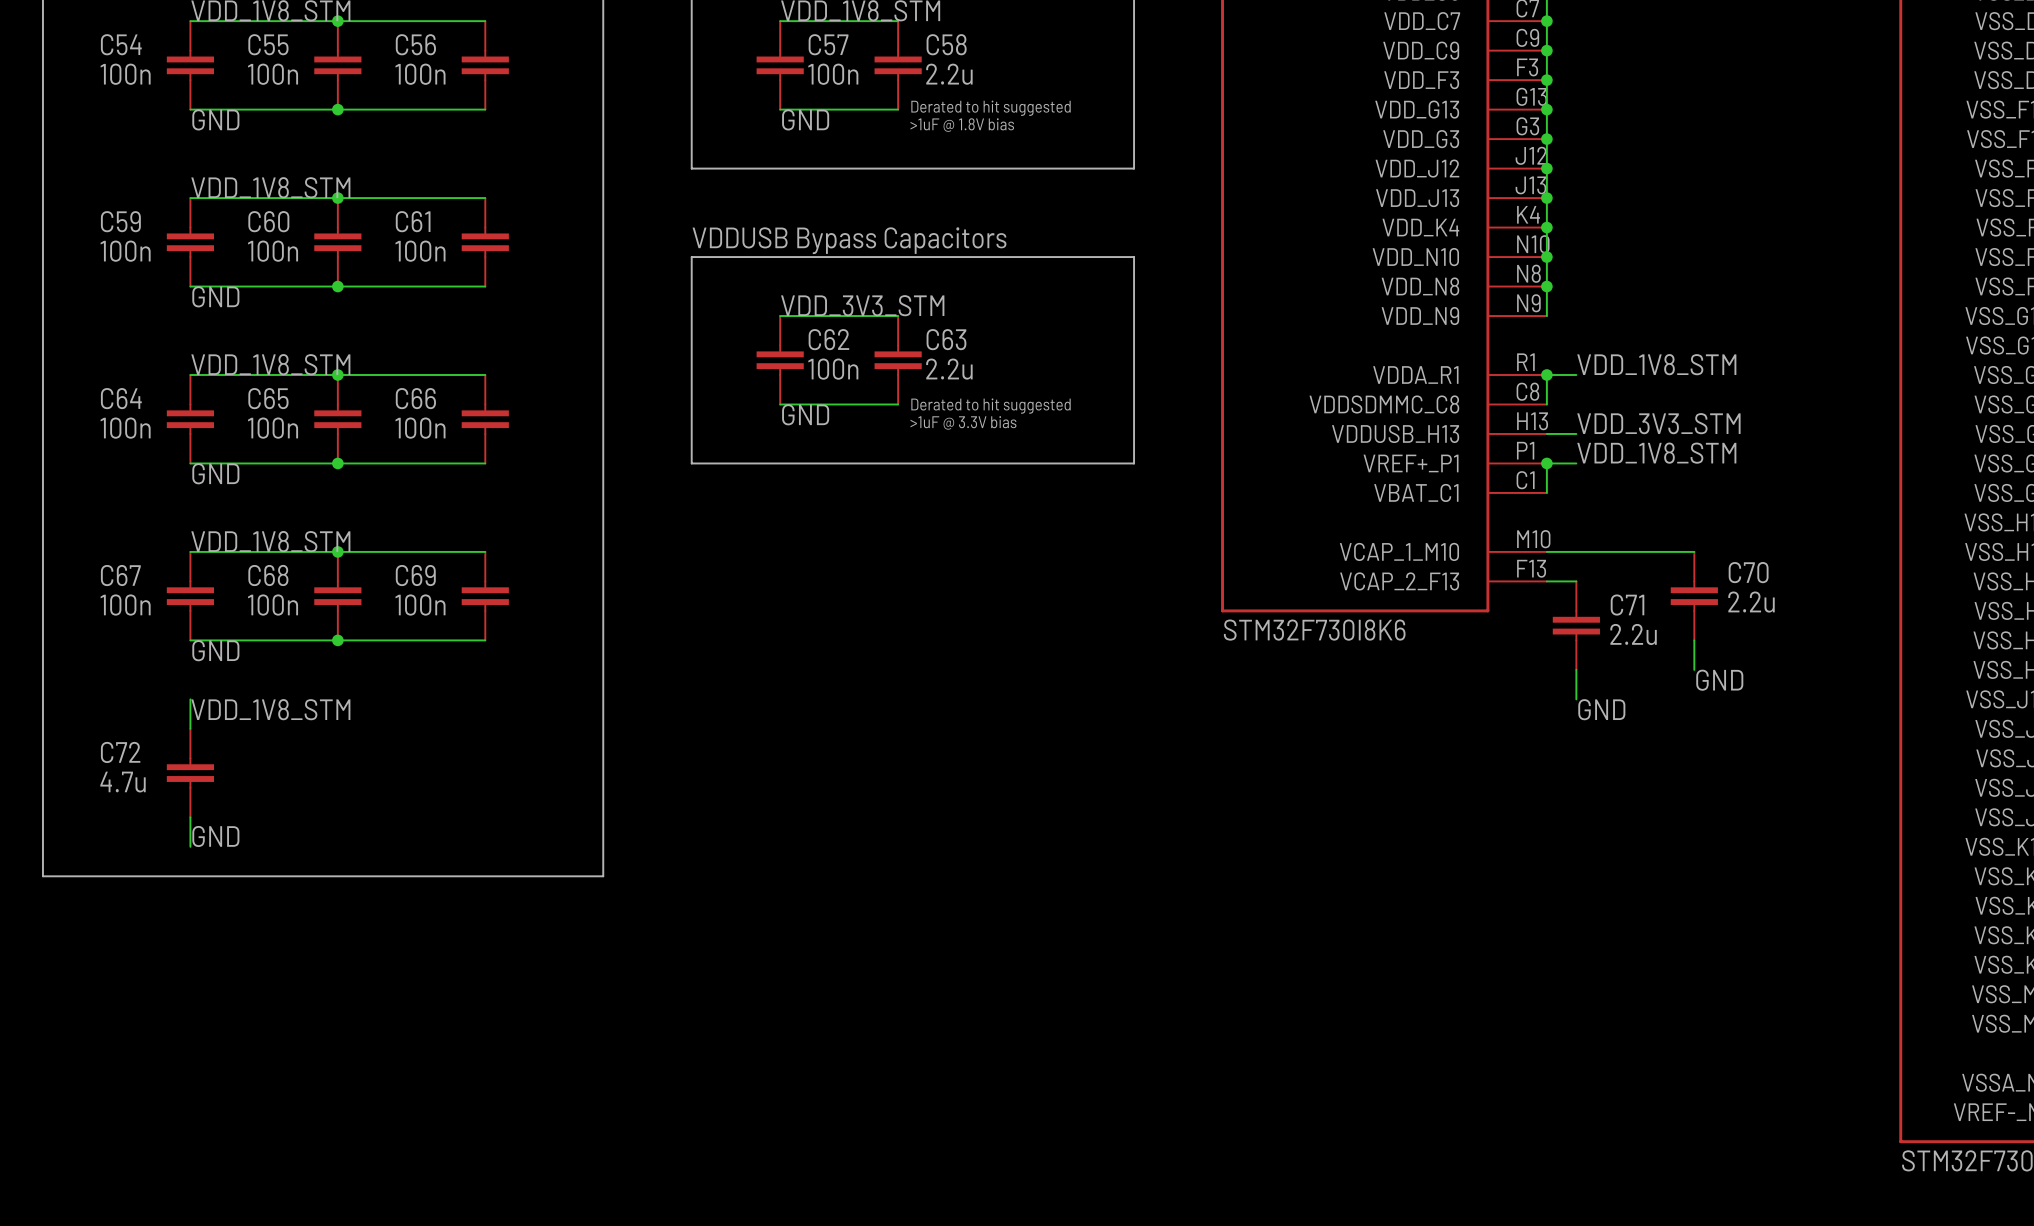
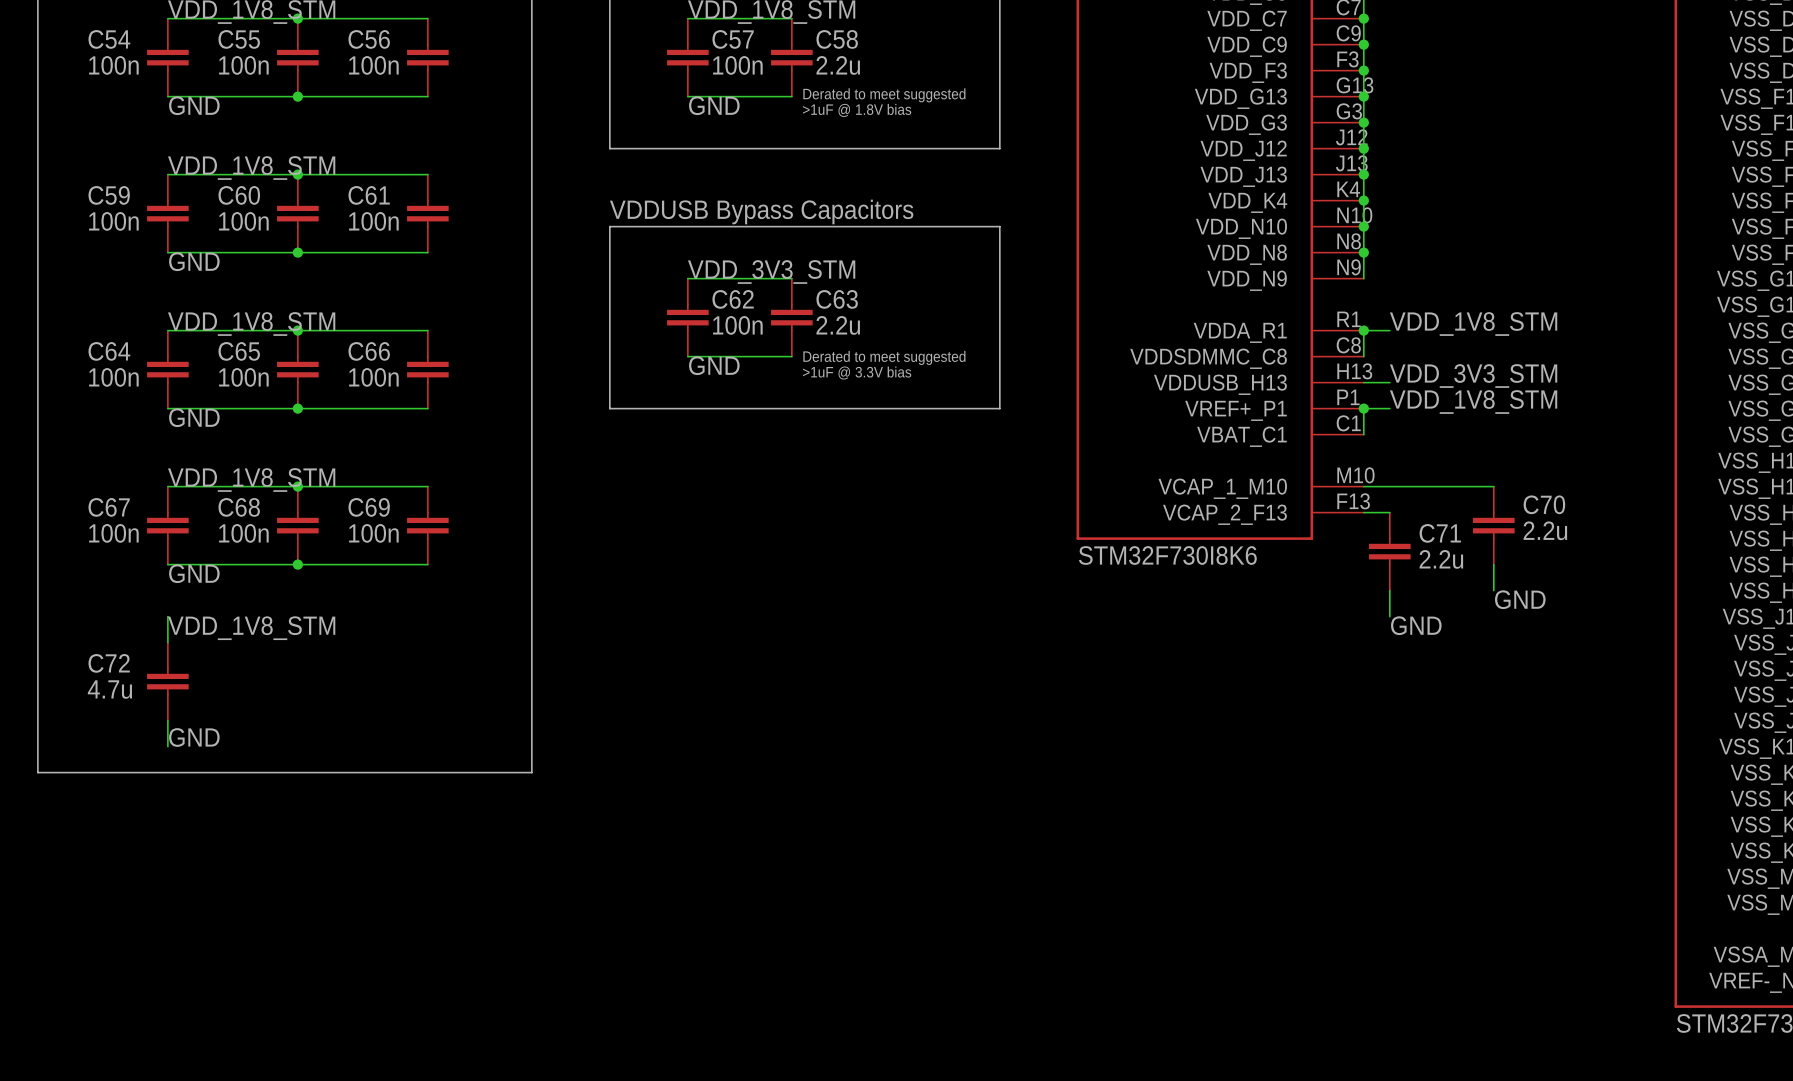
text: Derated to hit suggested (991, 108) -> Derated to meet suggested (884, 95)
text: Derated to hit suggested (991, 406) -> Derated to meet suggested (884, 357)

